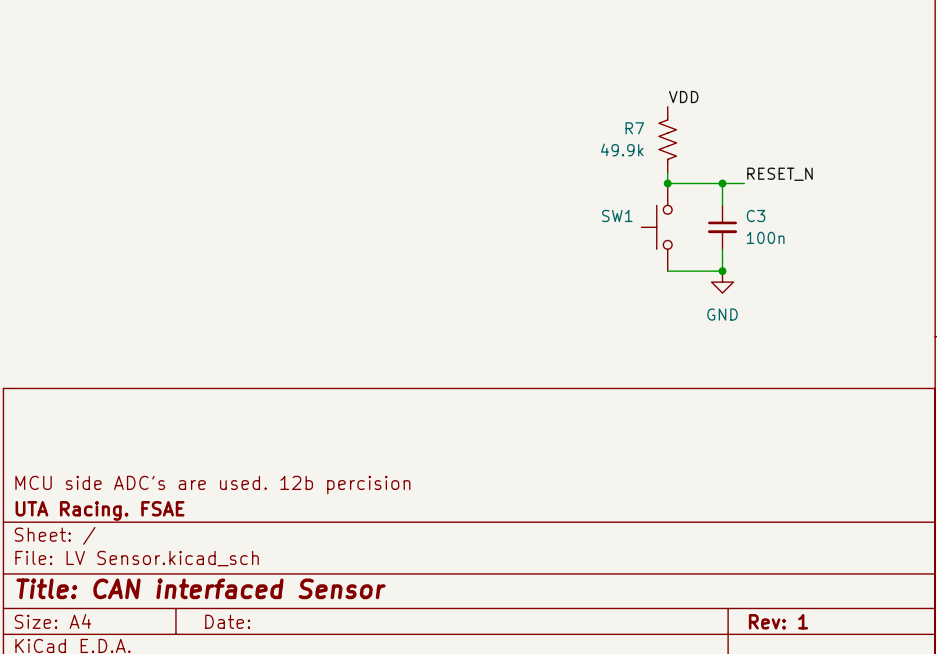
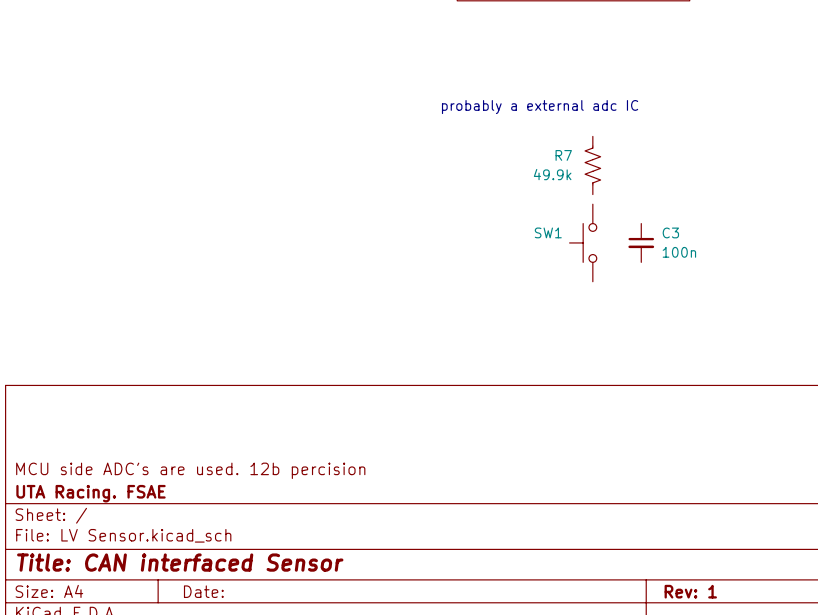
text: none -> probably a external adc IC (540, 107)
label: VDD (683, 97) -> none
wire: (667, 172) (667, 183) (744, 183) -> none
label: RESET_N (779, 174) -> none
junction: (667, 183) -> none
wire: (722, 183) (722, 205) -> none
junction: (722, 183) -> none
wire: (722, 249) (722, 271) (667, 271) -> none
junction: (722, 271) -> none
power symbol: GND (722, 282) -> none

